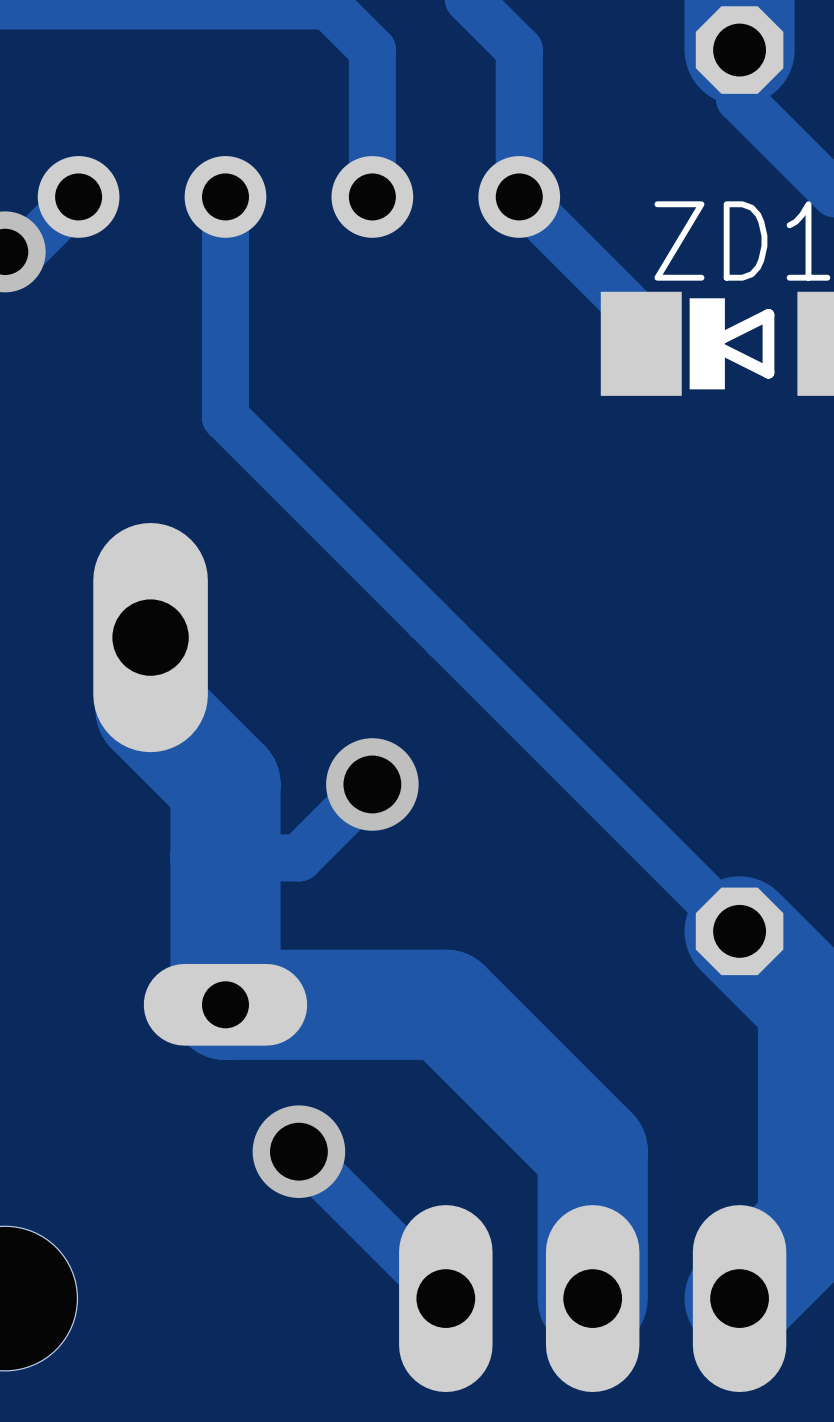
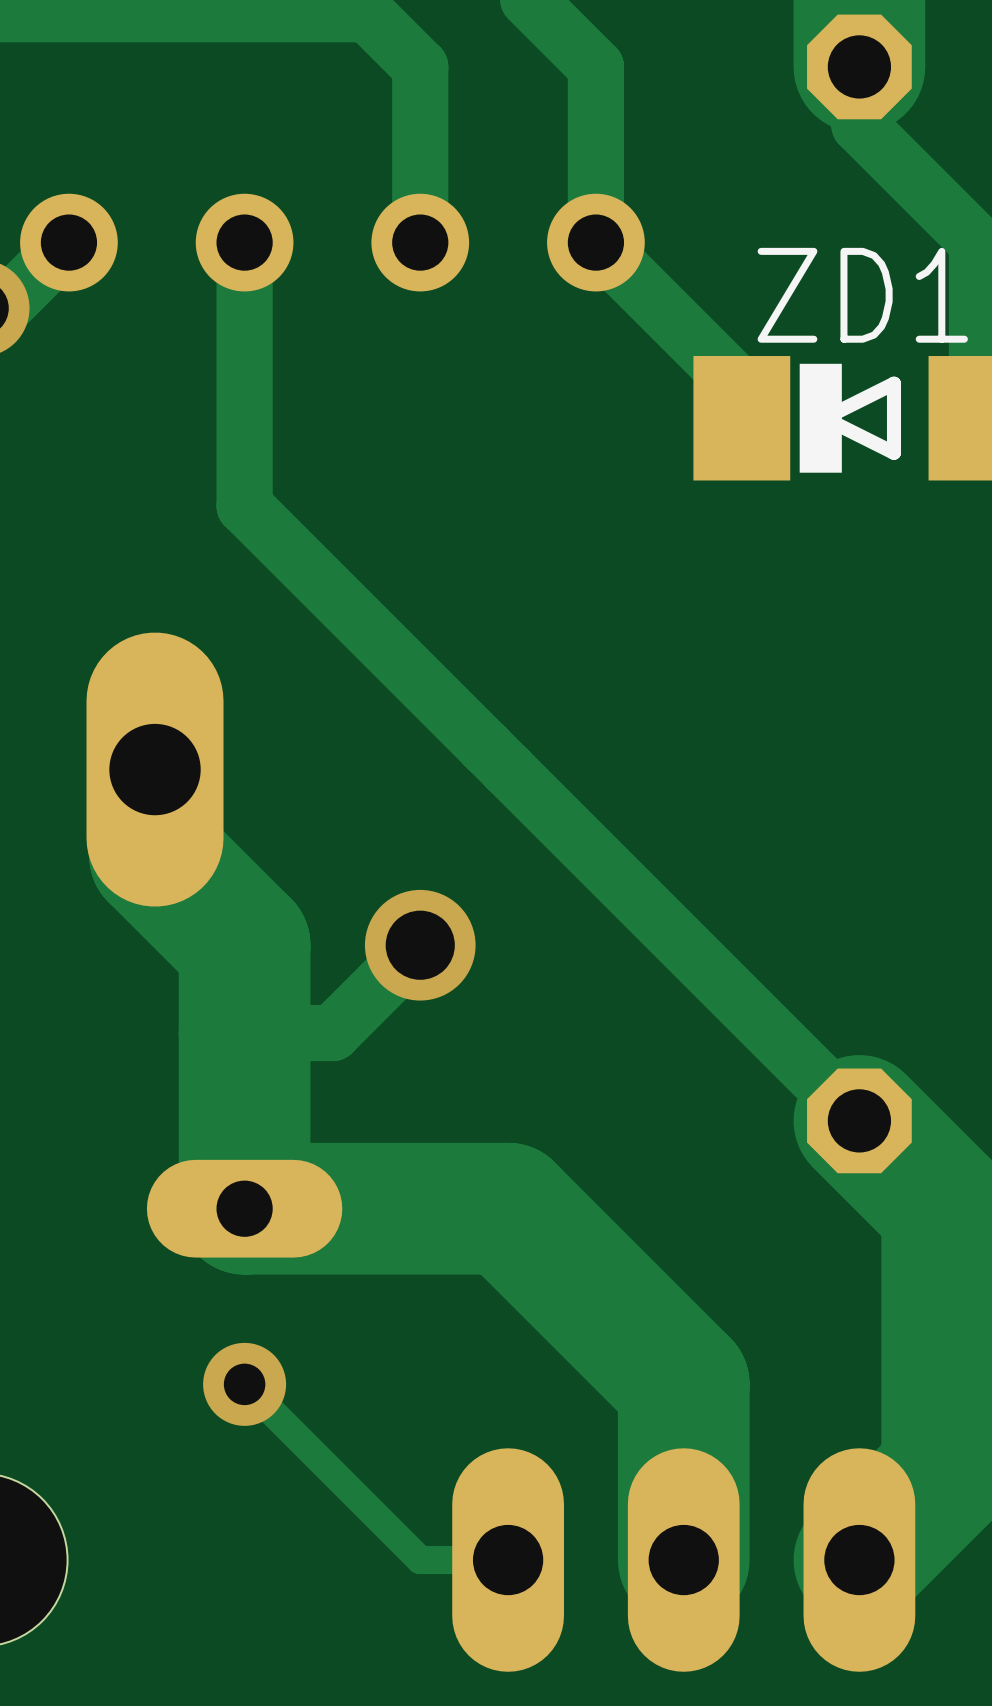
via: none -> (244, 1384)
track: (298, 1151) (445, 1298) -> (244, 1384) (420, 1560) (508, 1560)
via: (298, 1151) -> none

